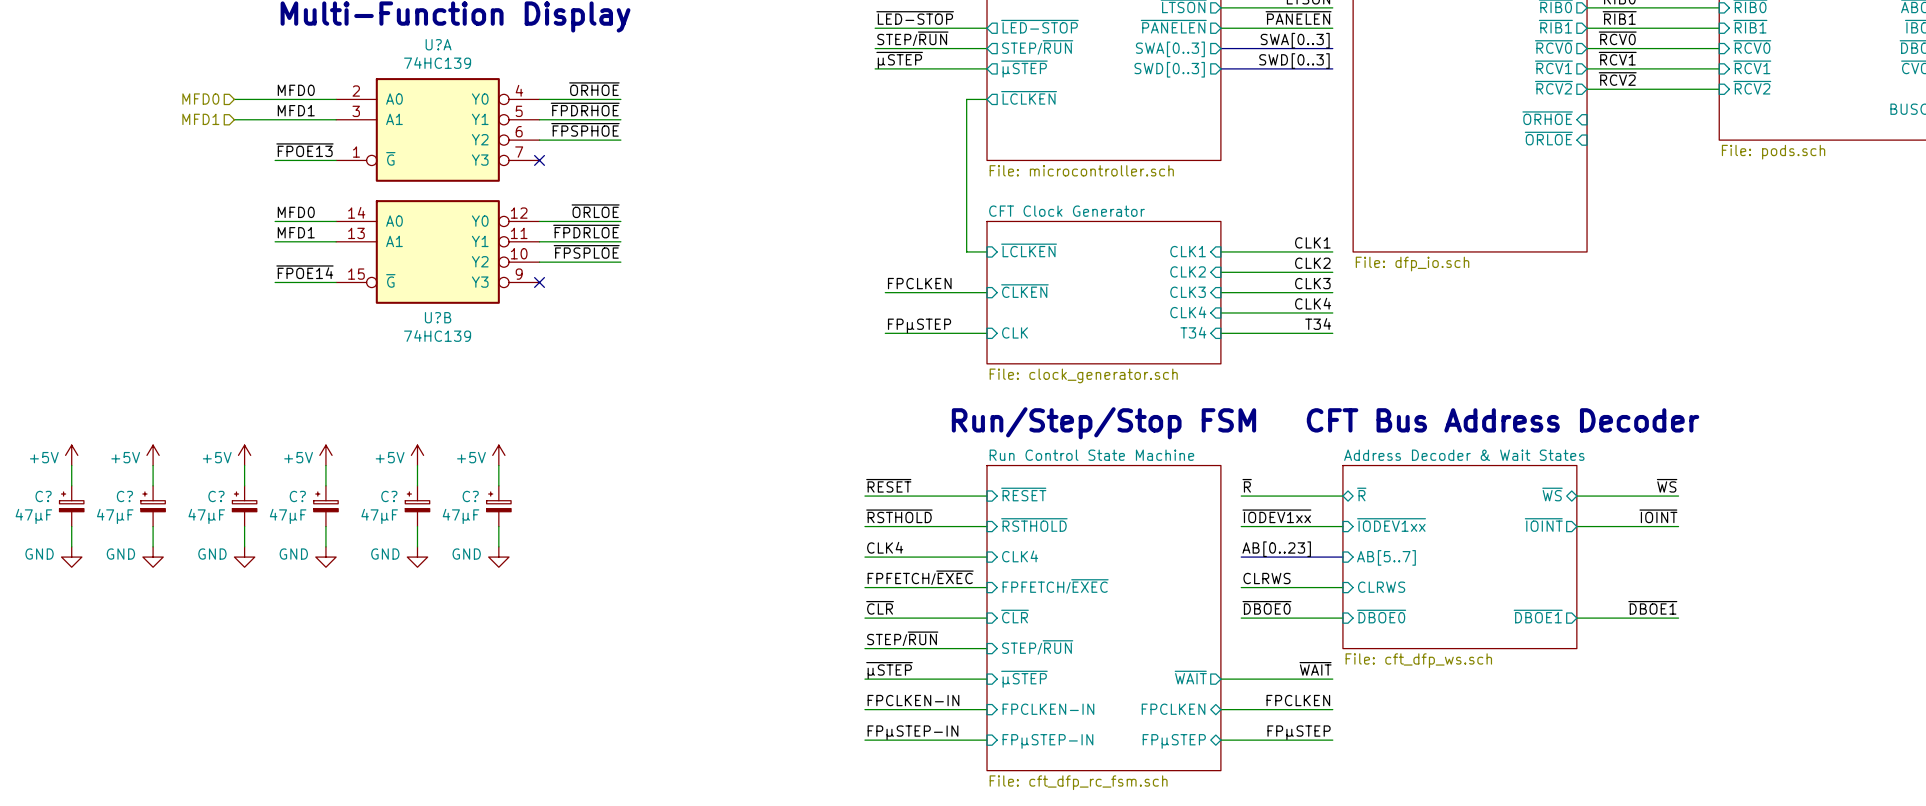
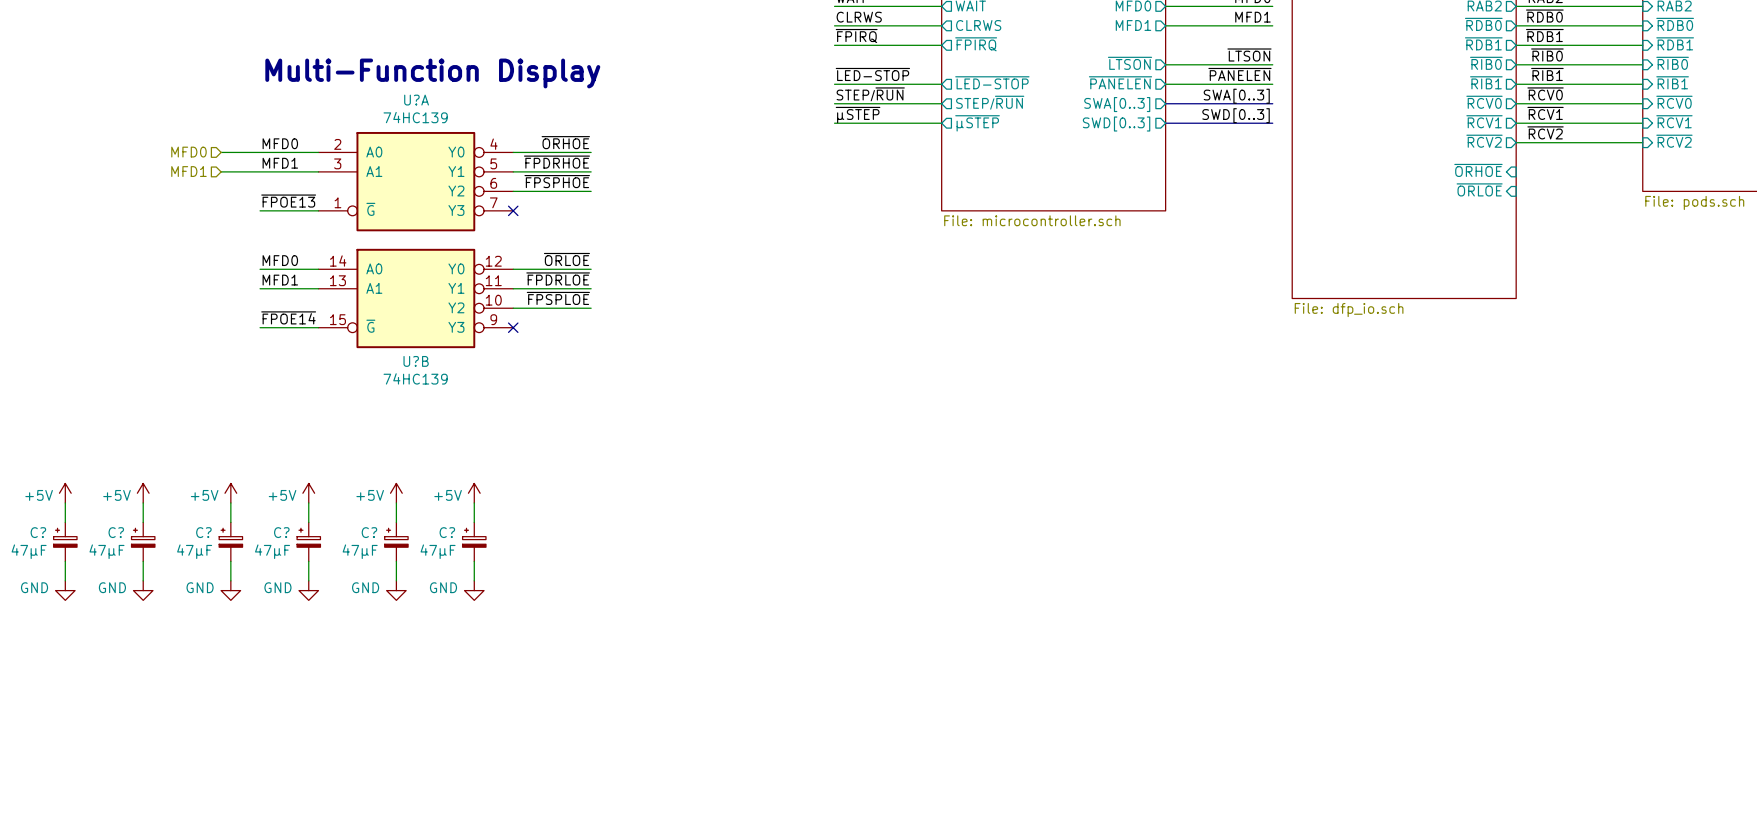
sheet pin: ~{LCLKEN} (1029, 97) -> none
wire: (987, 99) (966, 99) (966, 251) (987, 251) -> none
label: CLK1 (1312, 242) -> none
sheet pin: ~{LCLKEN} (1029, 250) -> none
sheet pin: CLK1 (1188, 251) -> none
wire: (1220, 251) (1332, 251) -> none
label: CLK2 (1312, 263) -> none
sheet pin: CLK2 (1188, 271) -> none
wire: (1220, 272) (1332, 272) -> none
label: FPCLKEN (919, 283) -> none
label: CLK3 (1312, 283) -> none
sheet pin: ~{CLKEN} (1024, 291) -> none
wire: (885, 292) (987, 292) -> none
sheet CFT Clock Generator: File: clock_generator.sch (1103, 292) -> none
sheet pin: CLK3 (1188, 292) -> none
wire: (1220, 292) (1332, 292) -> none
label: CLK4 (1313, 303) -> none
sheet pin: CLK4 (1188, 312) -> none
wire: (1220, 312) (1332, 312) -> none
label: T34 (1318, 324) -> none
label: FPµSTEP (919, 325) -> none
sheet pin: CLK (1015, 332) -> none
sheet pin: T34 (1193, 332) -> none
wire: (885, 333) (987, 333) -> none
wire: (1220, 333) (1332, 333) -> none
text: CFT Bus Address Decoder (1503, 420) -> none
text: Run/Step/Stop FSM (1103, 423) -> none
label: ~{RESET} (888, 485) -> none
label: ~{R} (1247, 485) -> none
label: ~{WS} (1667, 485) -> none
sheet pin: ~{RESET} (1023, 494) -> none
sheet pin: ~{R} (1361, 494) -> none
sheet pin: ~{WS} (1552, 494) -> none
wire: (864, 496) (987, 496) -> none
wire: (1241, 496) (1342, 496) -> none
wire: (1576, 496) (1678, 496) -> none
label: ~{RSTHOLD} (899, 516) -> none
label: ~{IODEV1xx} (1276, 516) -> none
label: ~{IOINT} (1658, 516) -> none
sheet pin: ~{RSTHOLD} (1034, 525) -> none
sheet pin: ~{IODEV1xx} (1391, 525) -> none
sheet pin: ~{IOINT} (1543, 525) -> none
wire: (864, 526) (987, 526) -> none
wire: (1241, 526) (1342, 526) -> none
wire: (1576, 526) (1678, 526) -> none
label: CLK4 (885, 547) -> none
label: AB[0..23] (1276, 549) -> none
sheet pin: CLK4 (1020, 556) -> none
wire: (864, 557) (987, 557) -> none
bus: (1241, 557) (1342, 557) -> none
sheet pin: AB[5..7] (1386, 557) -> none
sheet Address Decoder & Wait States: File: cft_dfp_ws.sch (1459, 557) -> none
label: FPFETCH∕~{EXEC} (920, 577) -> none
label: CLRWS (1266, 578) -> none
sheet pin: FPFETCH∕~{EXEC} (1055, 586) -> none
wire: (864, 587) (987, 587) -> none
wire: (1241, 587) (1342, 587) -> none
sheet pin: CLRWS (1381, 587) -> none
label: ~{CLR} (880, 607) -> none
label: ~{DBOE0} (1266, 607) -> none
label: ~{DBOE1} (1652, 607) -> none
sheet pin: ~{CLR} (1015, 616) -> none
sheet pin: ~{DBOE0} (1381, 616) -> none
sheet pin: ~{DBOE1} (1538, 616) -> none
wire: (864, 618) (987, 618) -> none
sheet Run Control State Machine: File: cft_dfp_rc_fsm.sch (1103, 618) -> none
wire: (1241, 618) (1342, 618) -> none
wire: (1576, 618) (1678, 618) -> none
label: STEP∕~{RUN} (902, 639) -> none
sheet pin: STEP∕~{RUN} (1037, 647) -> none
wire: (864, 648) (987, 648) -> none
label: ~{WAIT} (1315, 668) -> none
label: ~{µSTEP} (889, 670) -> none
sheet pin: ~{WAIT} (1190, 677) -> none
wire: (864, 679) (987, 679) -> none
sheet pin: ~{µSTEP} (1024, 679) -> none
wire: (1220, 679) (1332, 679) -> none
label: FPCLKEN-IN (913, 700) -> none
label: FPCLKEN (1298, 700) -> none
wire: (864, 709) (987, 709) -> none
sheet pin: FPCLKEN-IN (1048, 709) -> none
sheet pin: FPCLKEN (1173, 709) -> none
wire: (1220, 709) (1332, 709) -> none
label: FPµSTEP-IN (912, 732) -> none
label: FPµSTEP (1299, 732) -> none
wire: (864, 740) (987, 740) -> none
wire: (1220, 740) (1332, 740) -> none
sheet pin: FPµSTEP-IN (1047, 741) -> none
sheet pin: FPµSTEP (1174, 741) -> none

